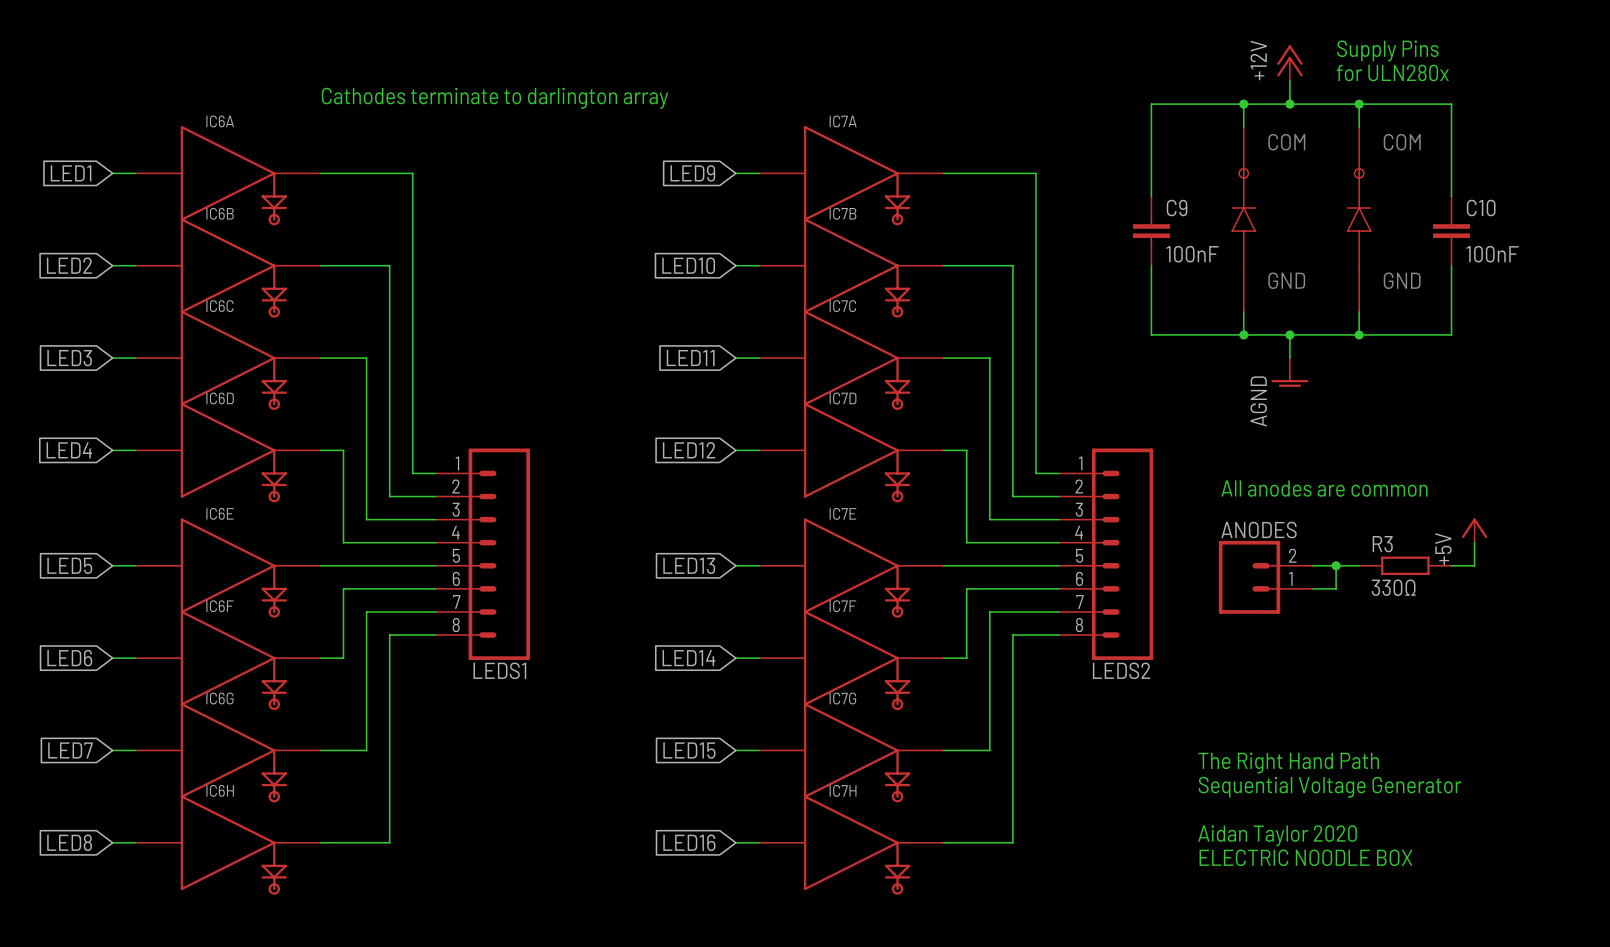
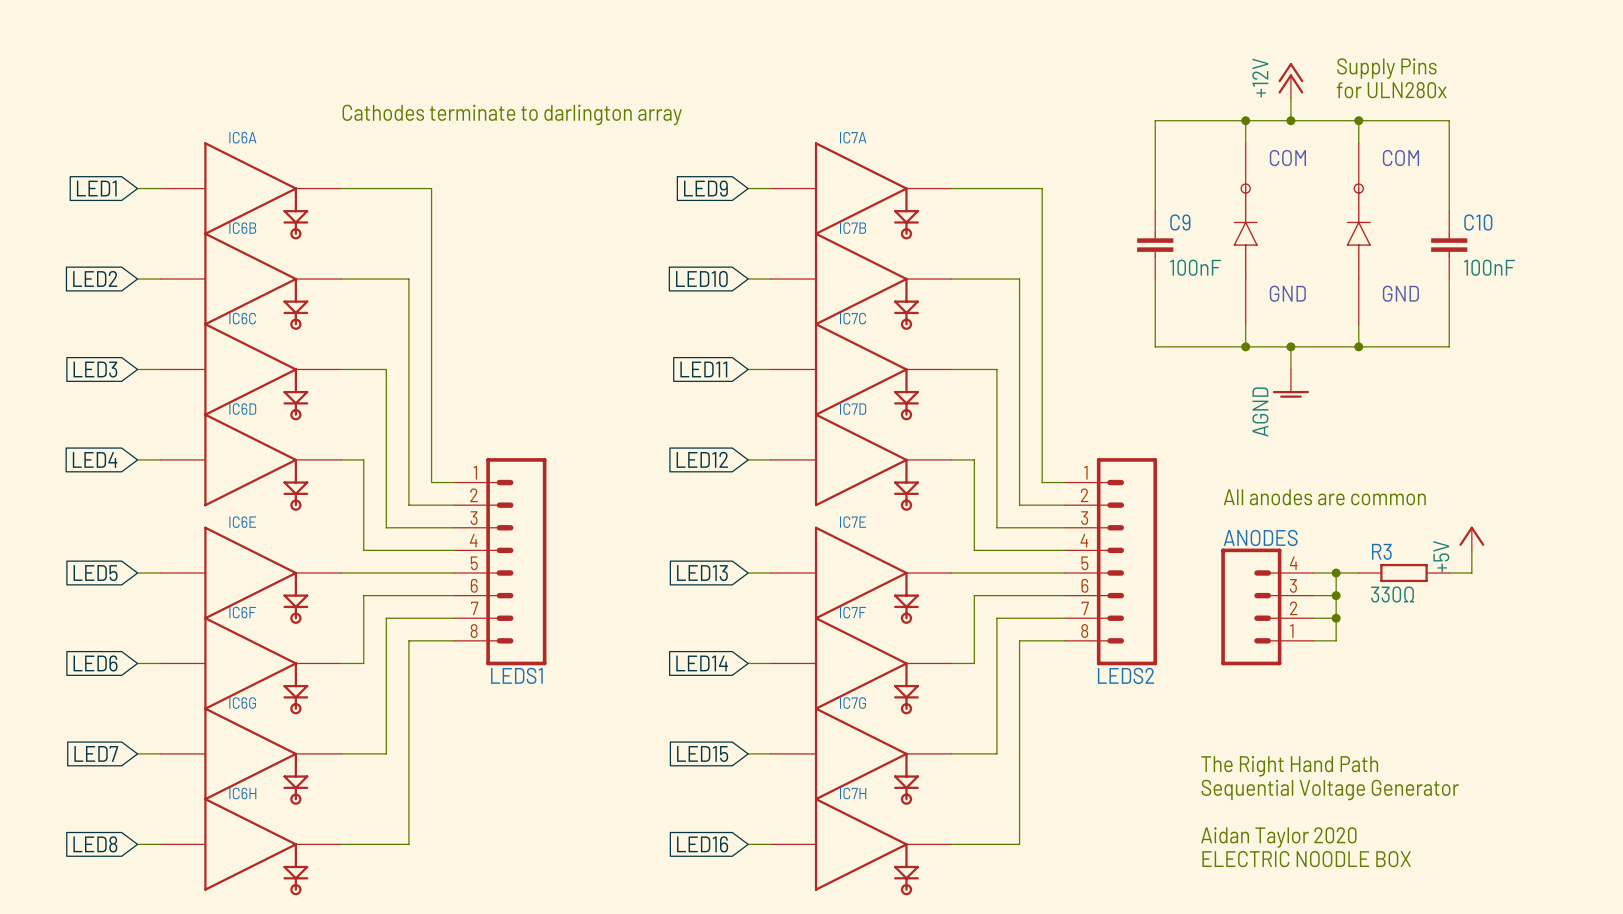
ANODES: (1265, 577) -> none
wire: none -> (1336, 595) (1336, 640) (1313, 640)
junction: none -> (1336, 595)
ANODES: none -> (1267, 606)
wire: none -> (1313, 618) (1336, 618)
junction: none -> (1336, 618)

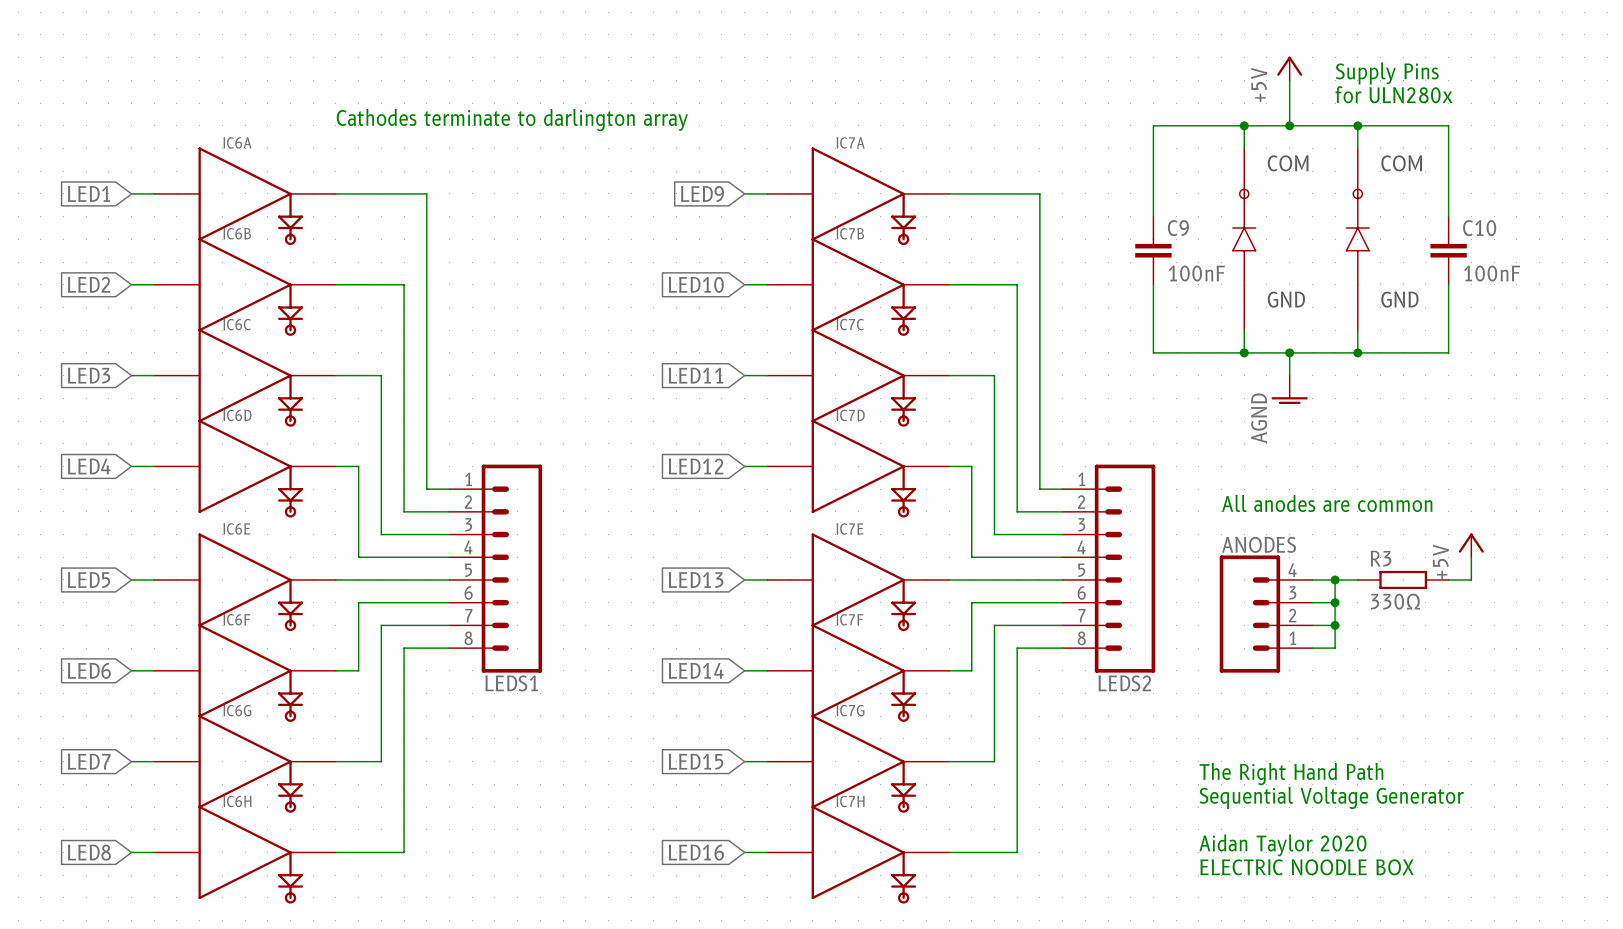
power symbol: none -> +5V (1289, 68)
power symbol: +12V (1290, 80) -> none

